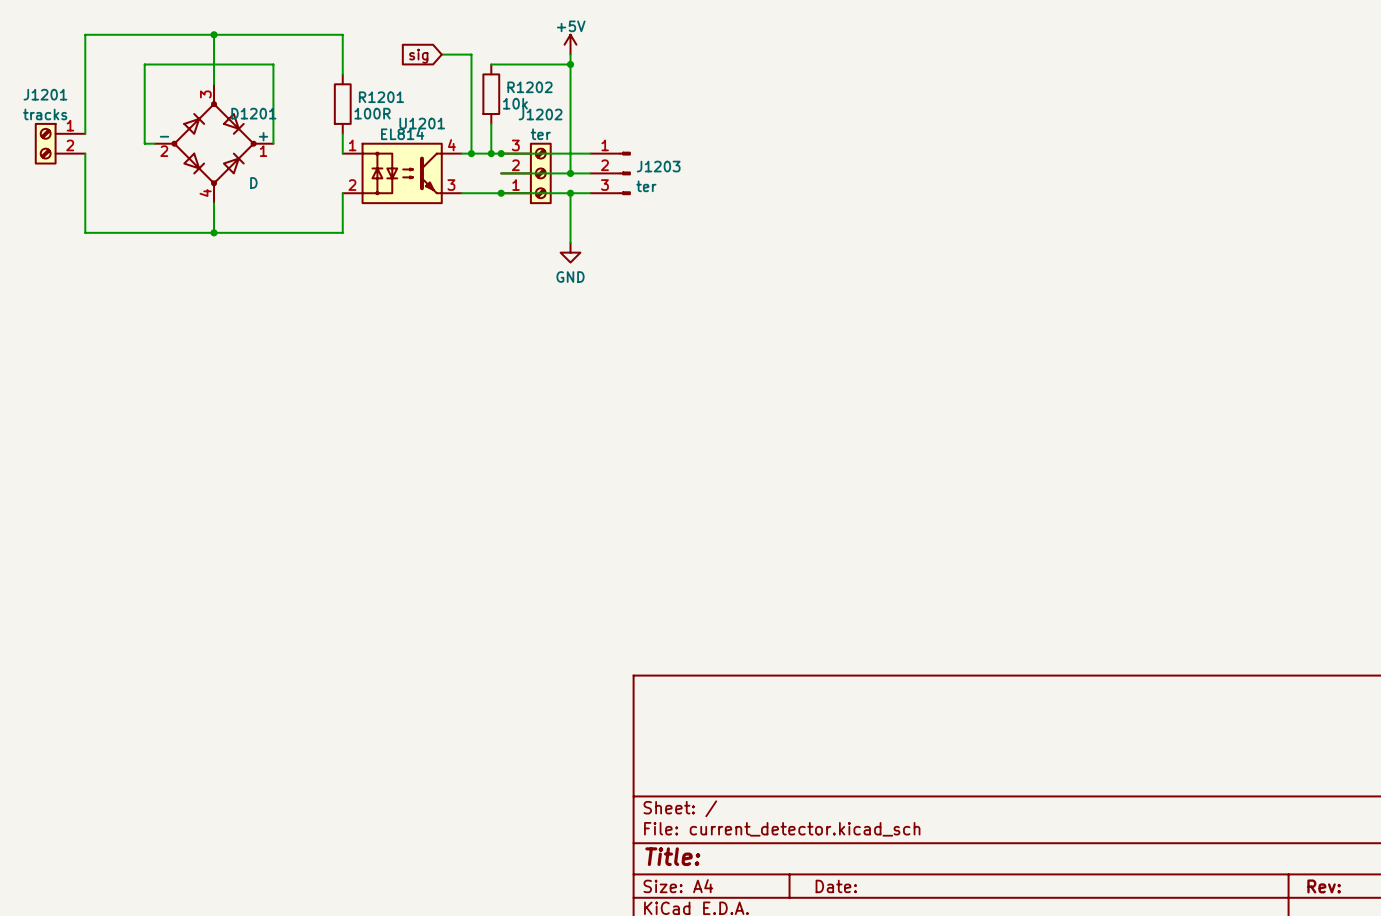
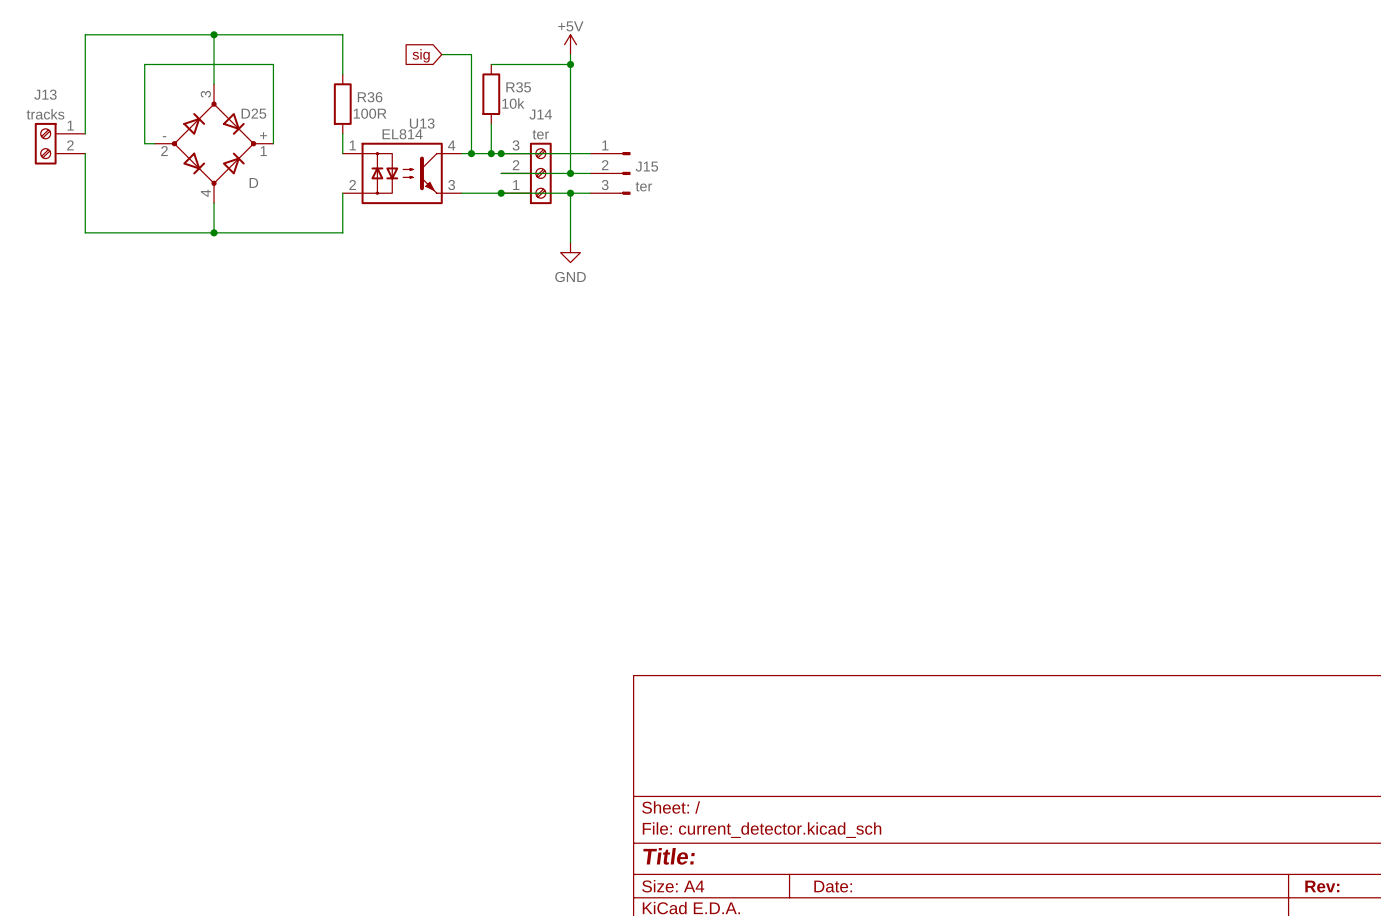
R1202 name: R1202 (529, 87) -> R35 (518, 87)
J1201 name: J1201 (45, 94) -> J13 (45, 94)
R1201 name: R1201 (381, 97) -> R36 (370, 97)
D1201 name: D1201 (253, 113) -> D25 (253, 113)
J1202 name: J1202 (540, 114) -> J14 (540, 114)
U1201 name: U1201 (422, 123) -> U13 (422, 123)
J1203 name: J1203 (658, 166) -> J15 (646, 166)

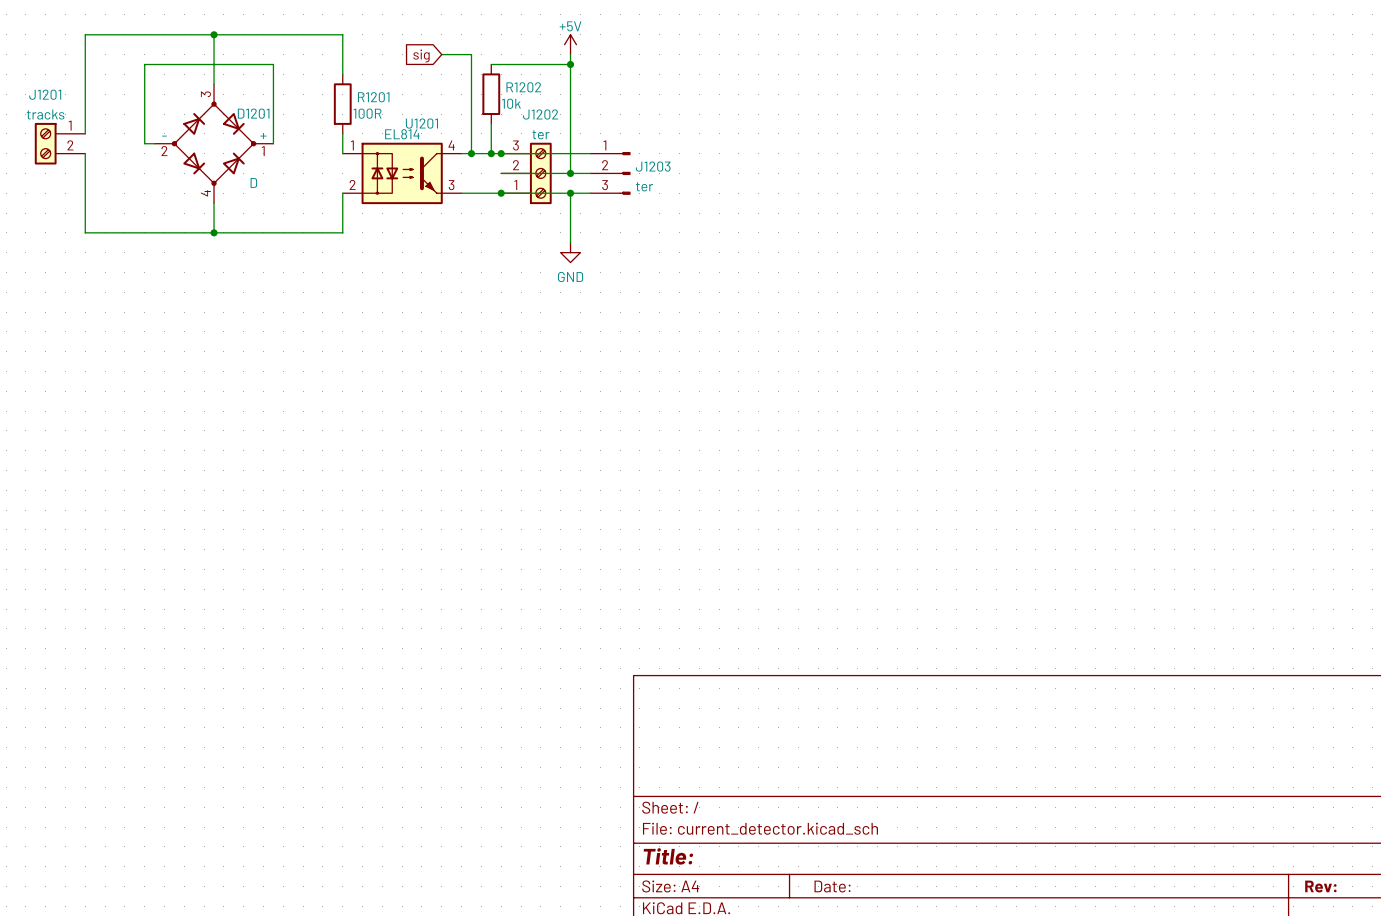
R35 name: R35 (518, 87) -> R1202 (523, 87)
J13 name: J13 (45, 94) -> J1201 (45, 94)
R36 name: R36 (370, 97) -> R1201 (373, 97)
D25 name: D25 (253, 113) -> D1201 (253, 113)
J14 name: J14 (540, 114) -> J1202 (540, 114)
U13 name: U13 (422, 123) -> U1201 (421, 123)
J15 name: J15 (646, 166) -> J1203 (653, 166)

